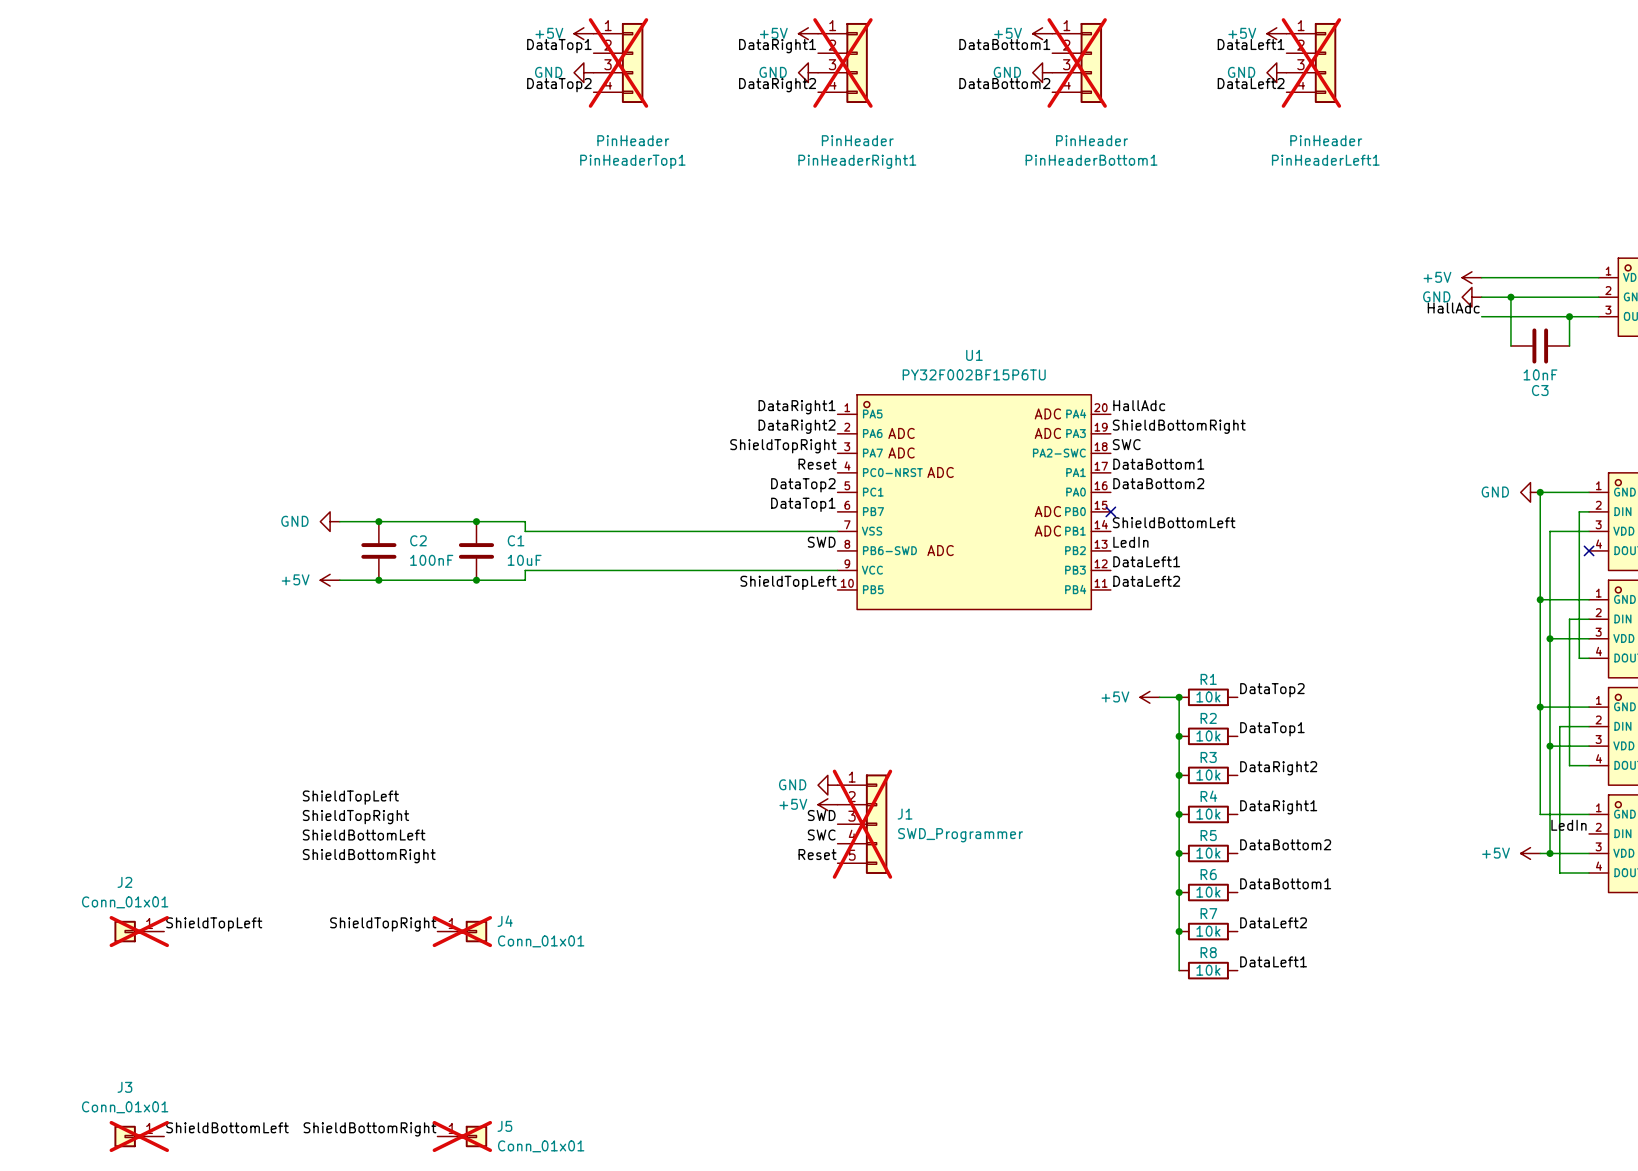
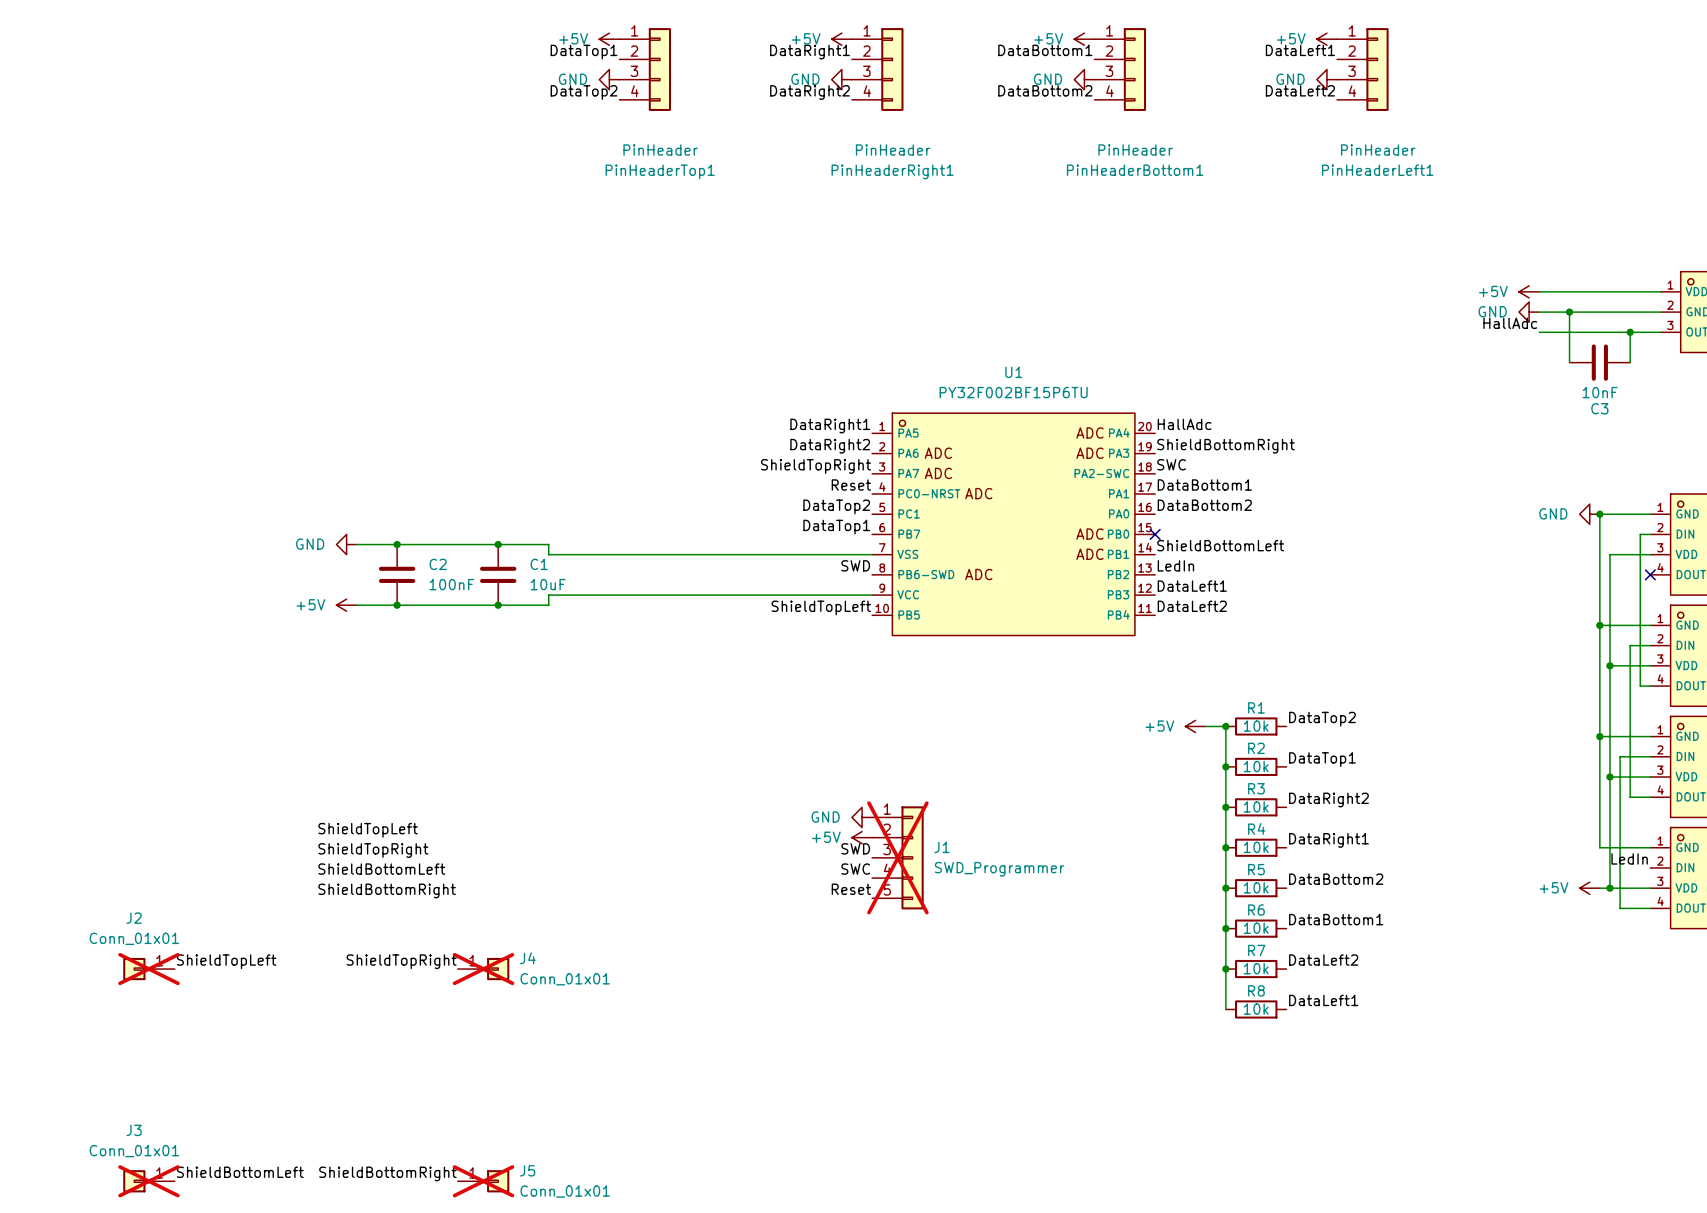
PinHeaderTop1 do-not-place cross: (618, 62) -> none
PinHeaderRight1 do-not-place cross: (842, 62) -> none
PinHeaderBottom1 do-not-place cross: (1077, 62) -> none
PinHeaderLeft1 do-not-place cross: (1311, 62) -> none

